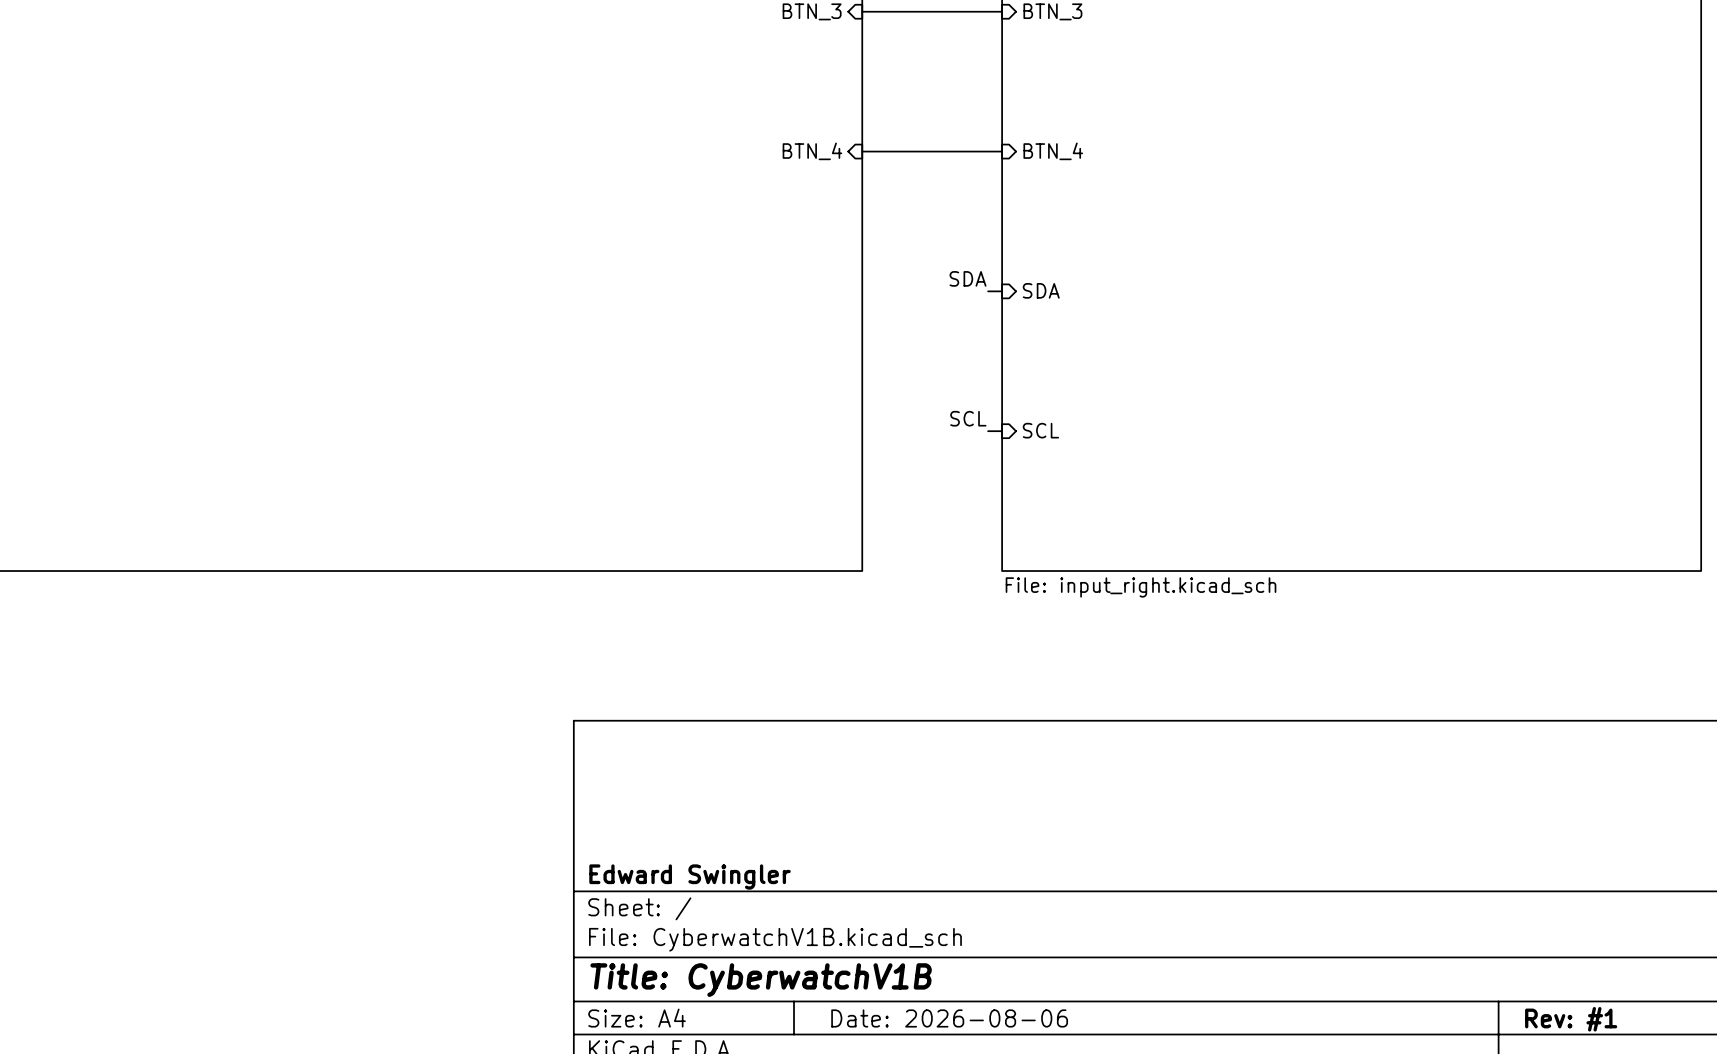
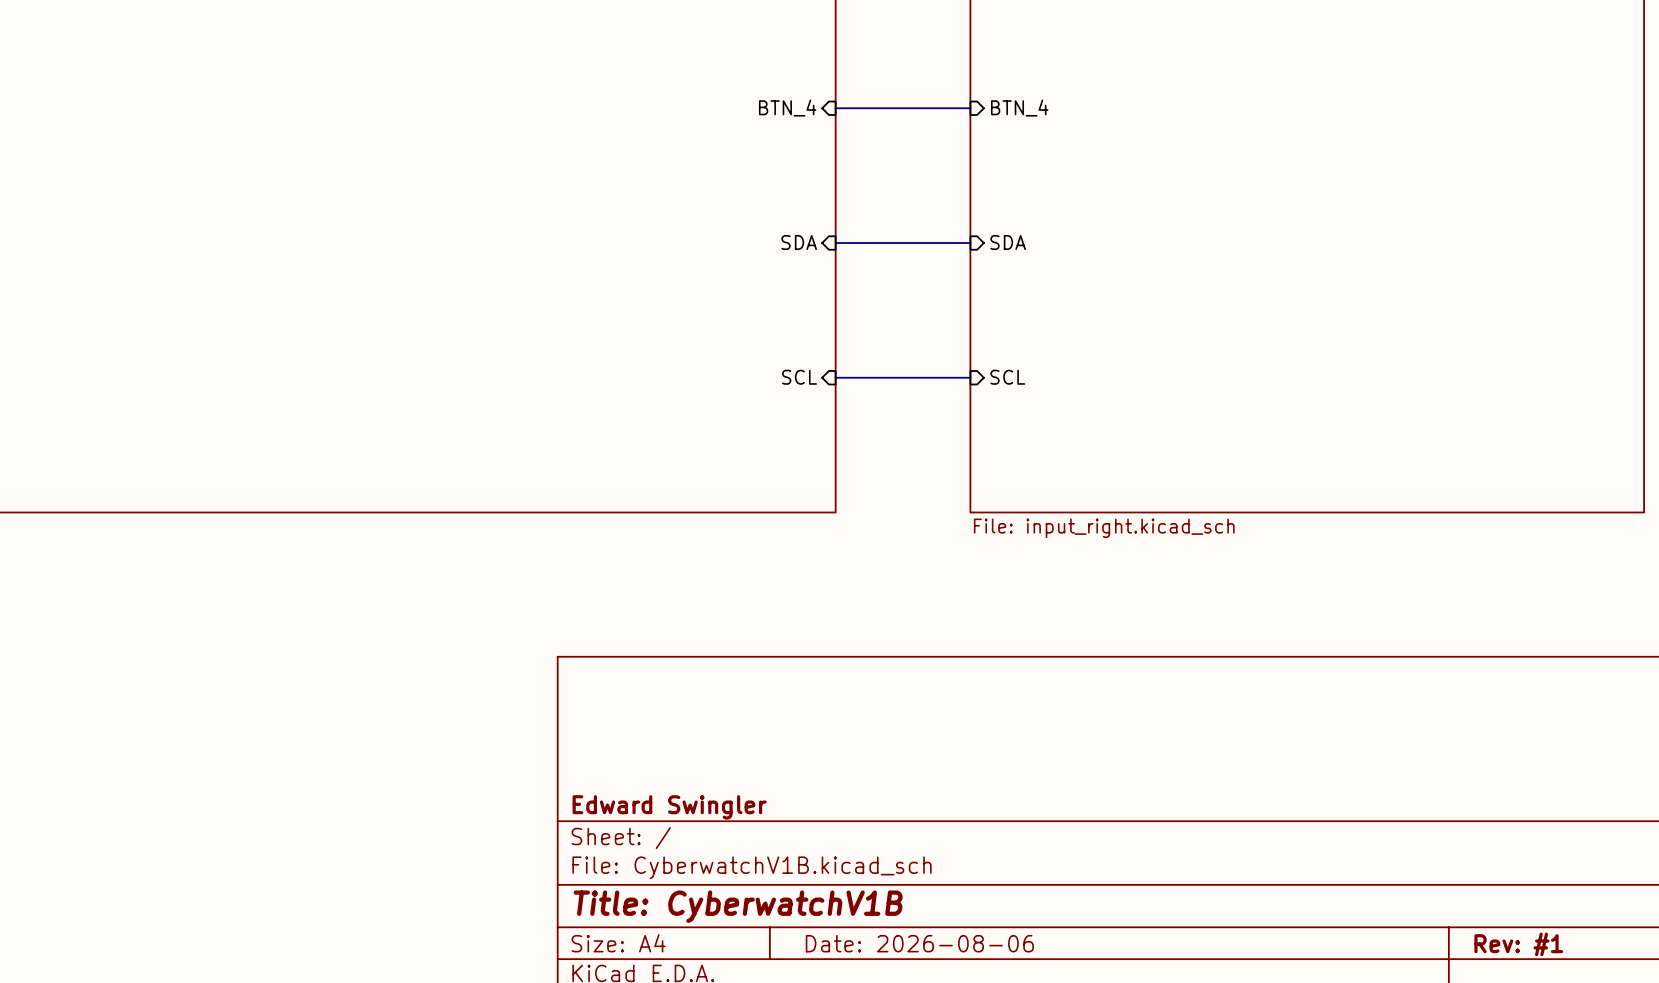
label: SDA (968, 278) -> none
sheet pin: none -> SDA (799, 242)
wire: none -> (835, 243) (956, 243)
label: SCL (968, 418) -> none
sheet pin: none -> SCL (799, 377)
wire: none -> (835, 377) (956, 377)

